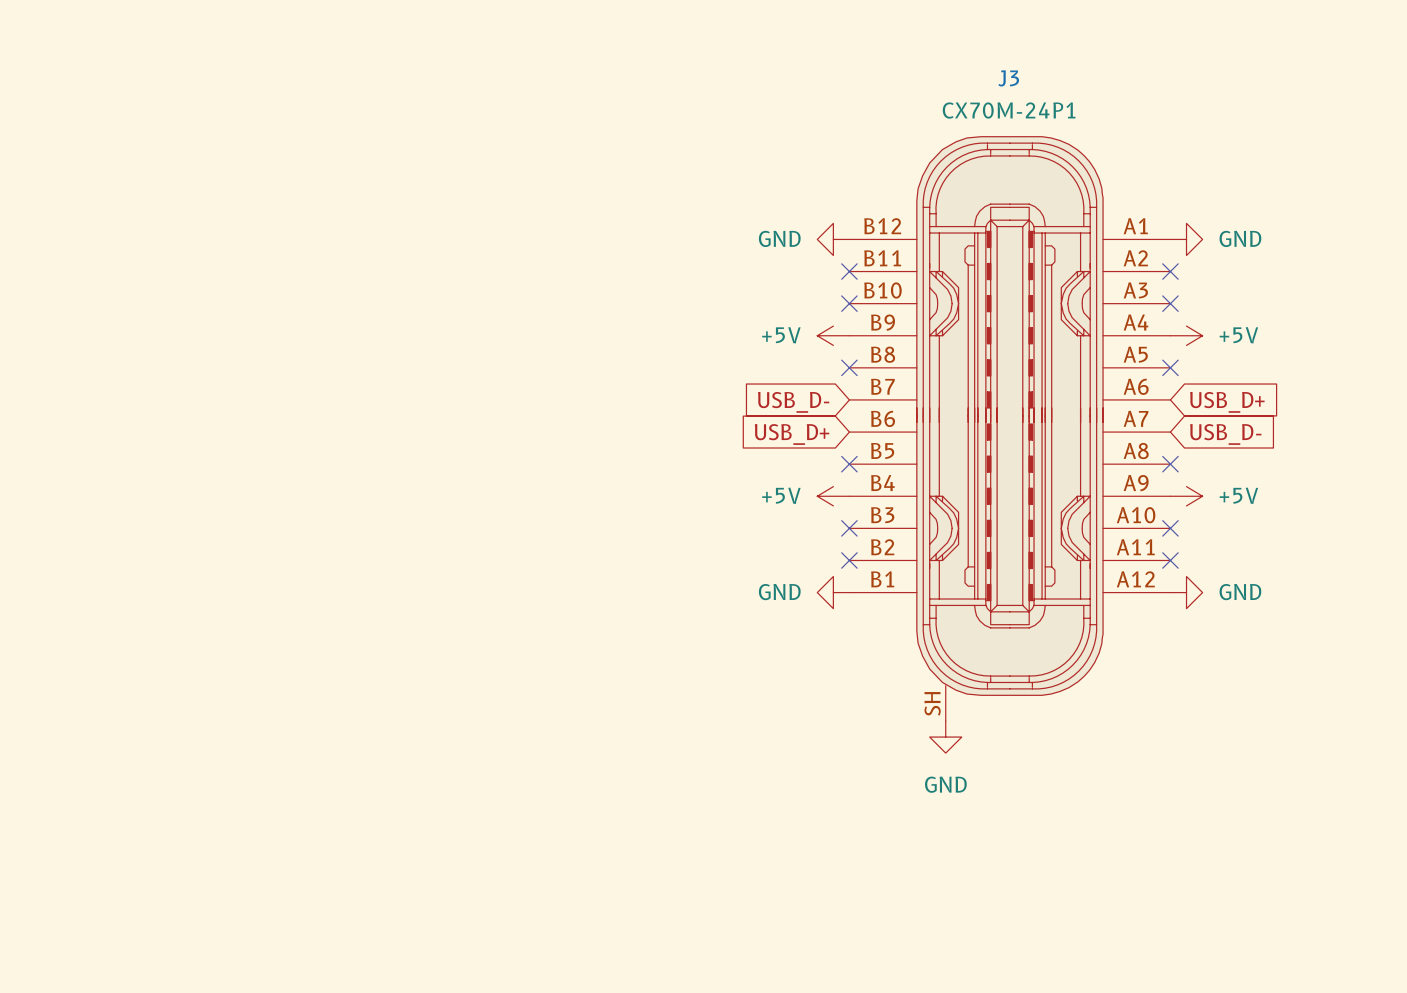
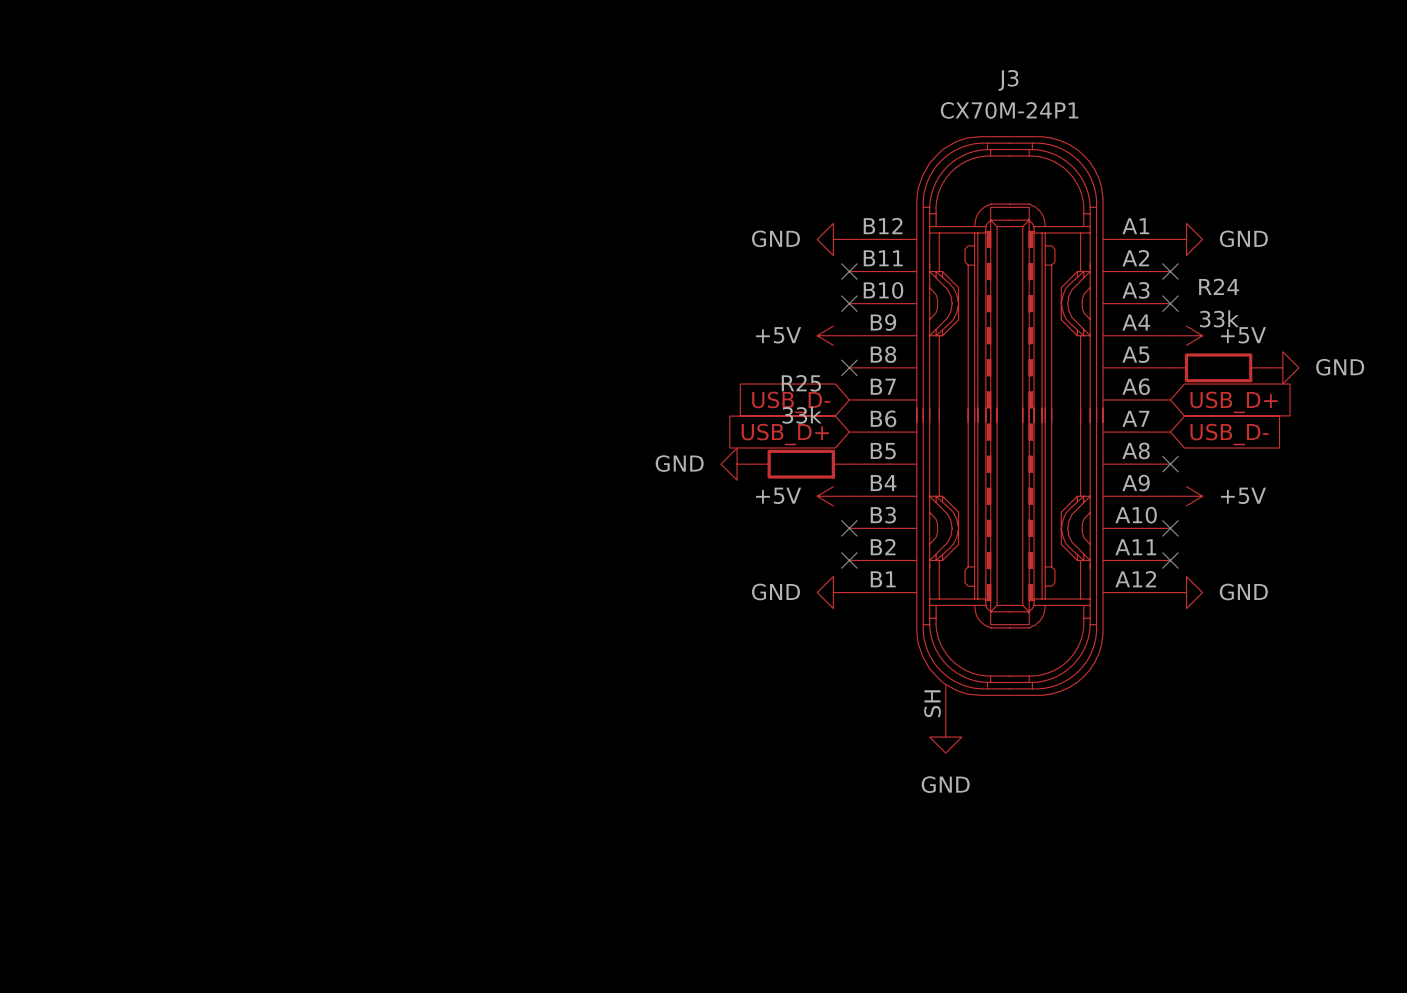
no-connect mark: (1170, 367) -> none
R24: none -> 33k (1218, 367)
power symbol: none -> GND (1282, 367)
power symbol: none -> GND (737, 464)
R25: none -> 33k (801, 464)
no-connect mark: (849, 464) -> none

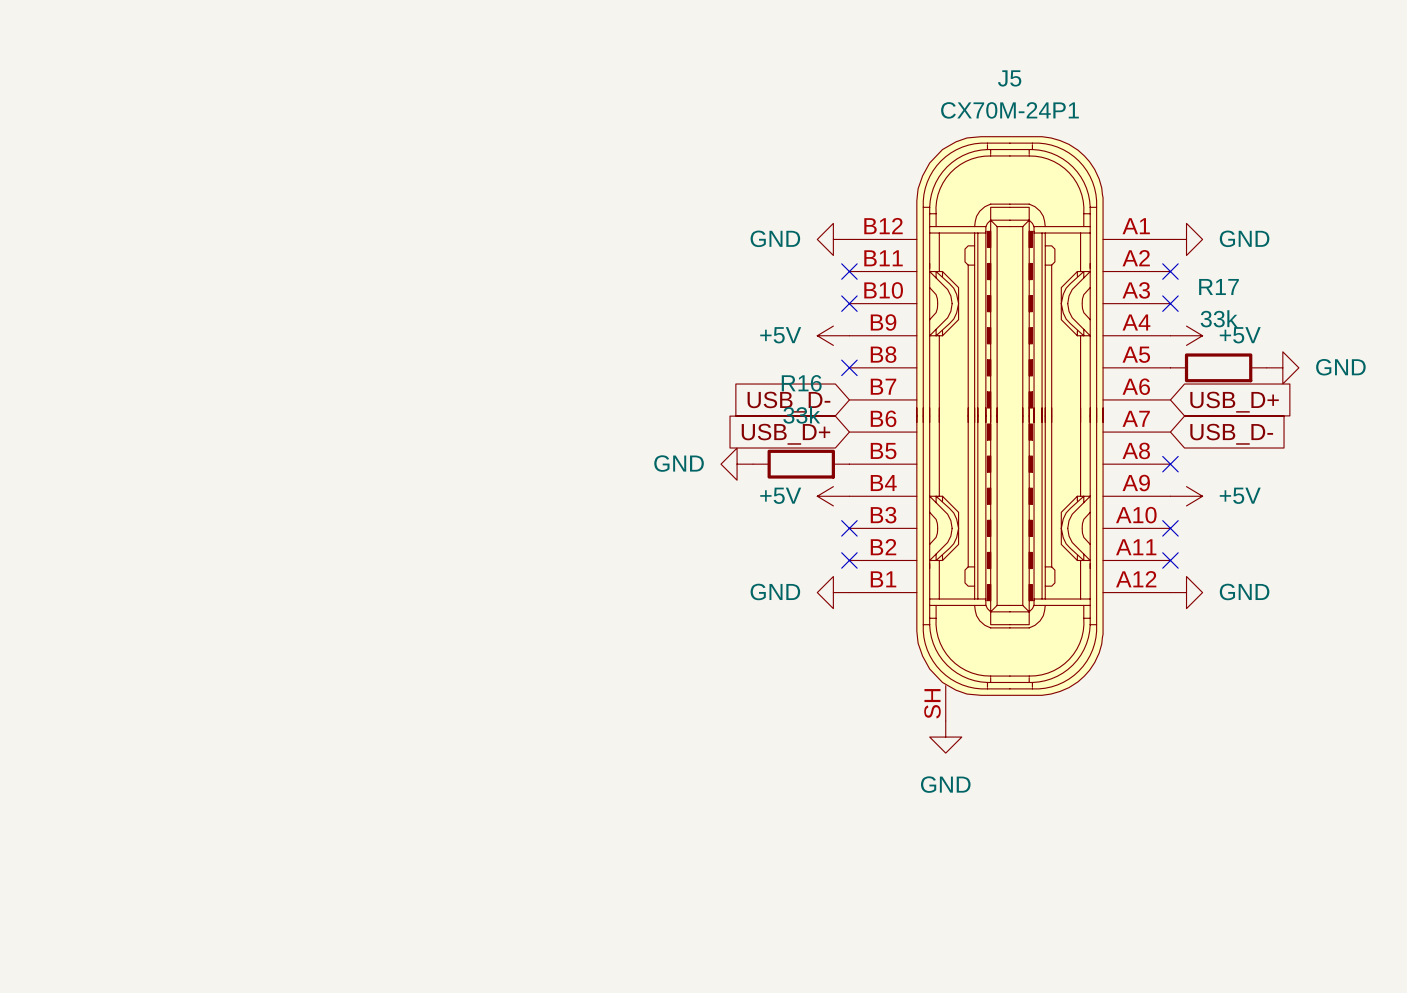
J3 name: J3 (1008, 80) -> J5 (1009, 78)
R24 name: R24 (1219, 286) -> R17 (1218, 286)
R25 name: R25 (801, 383) -> R16 (801, 383)

